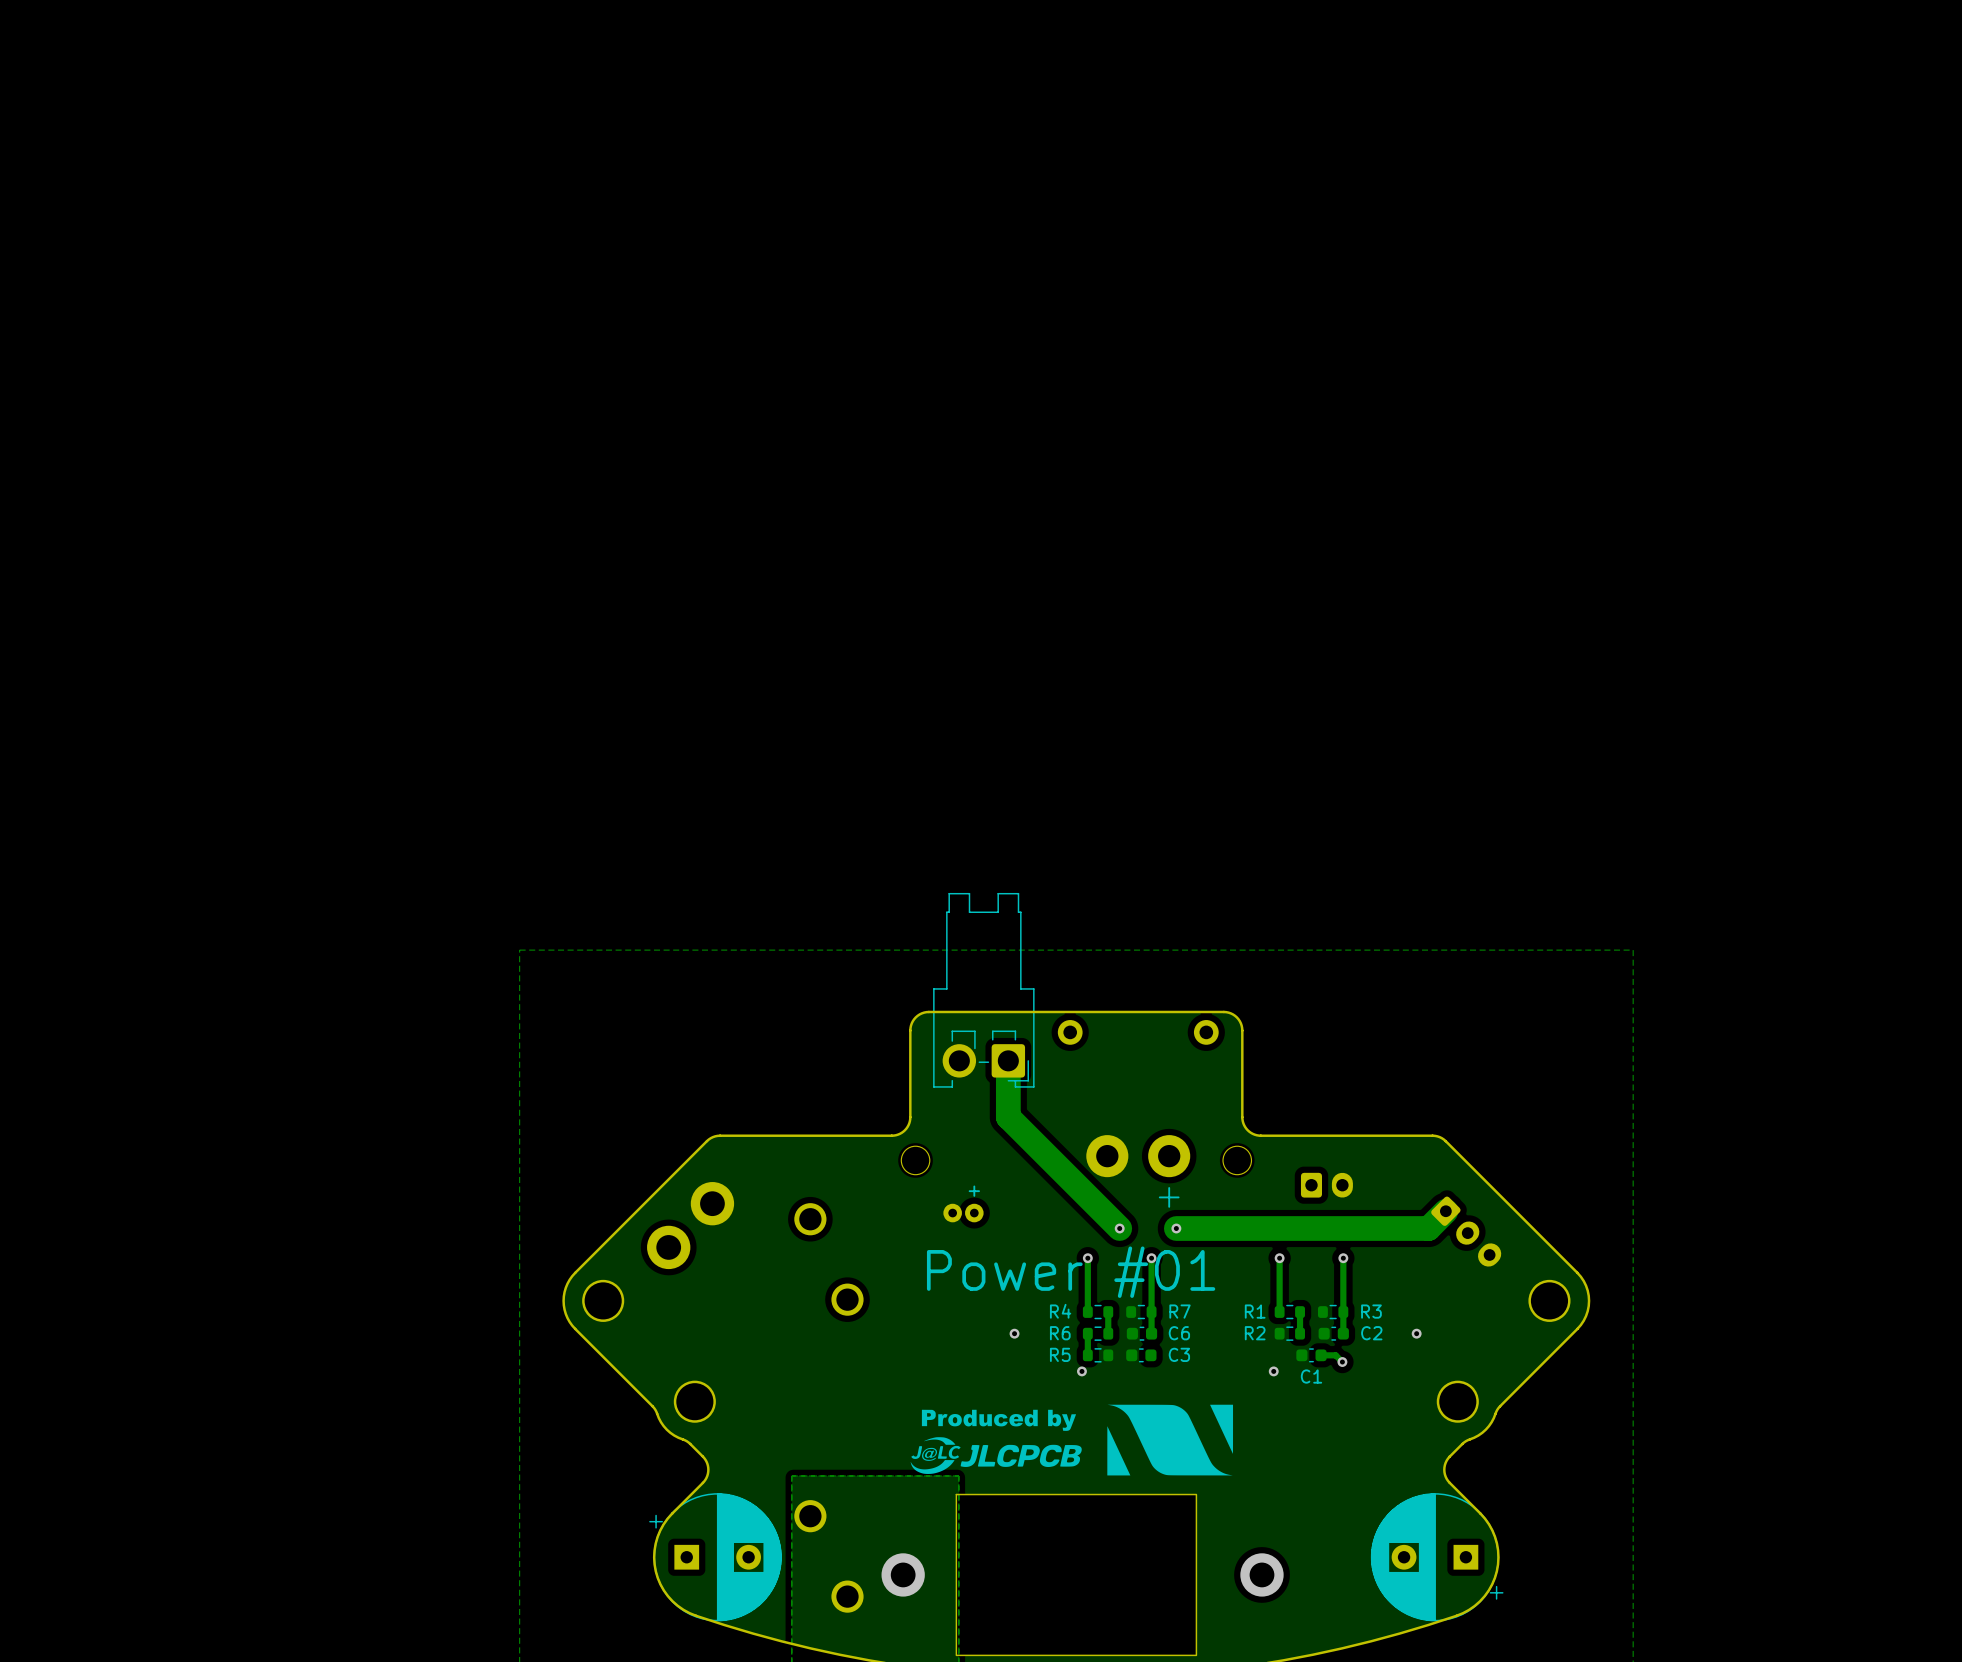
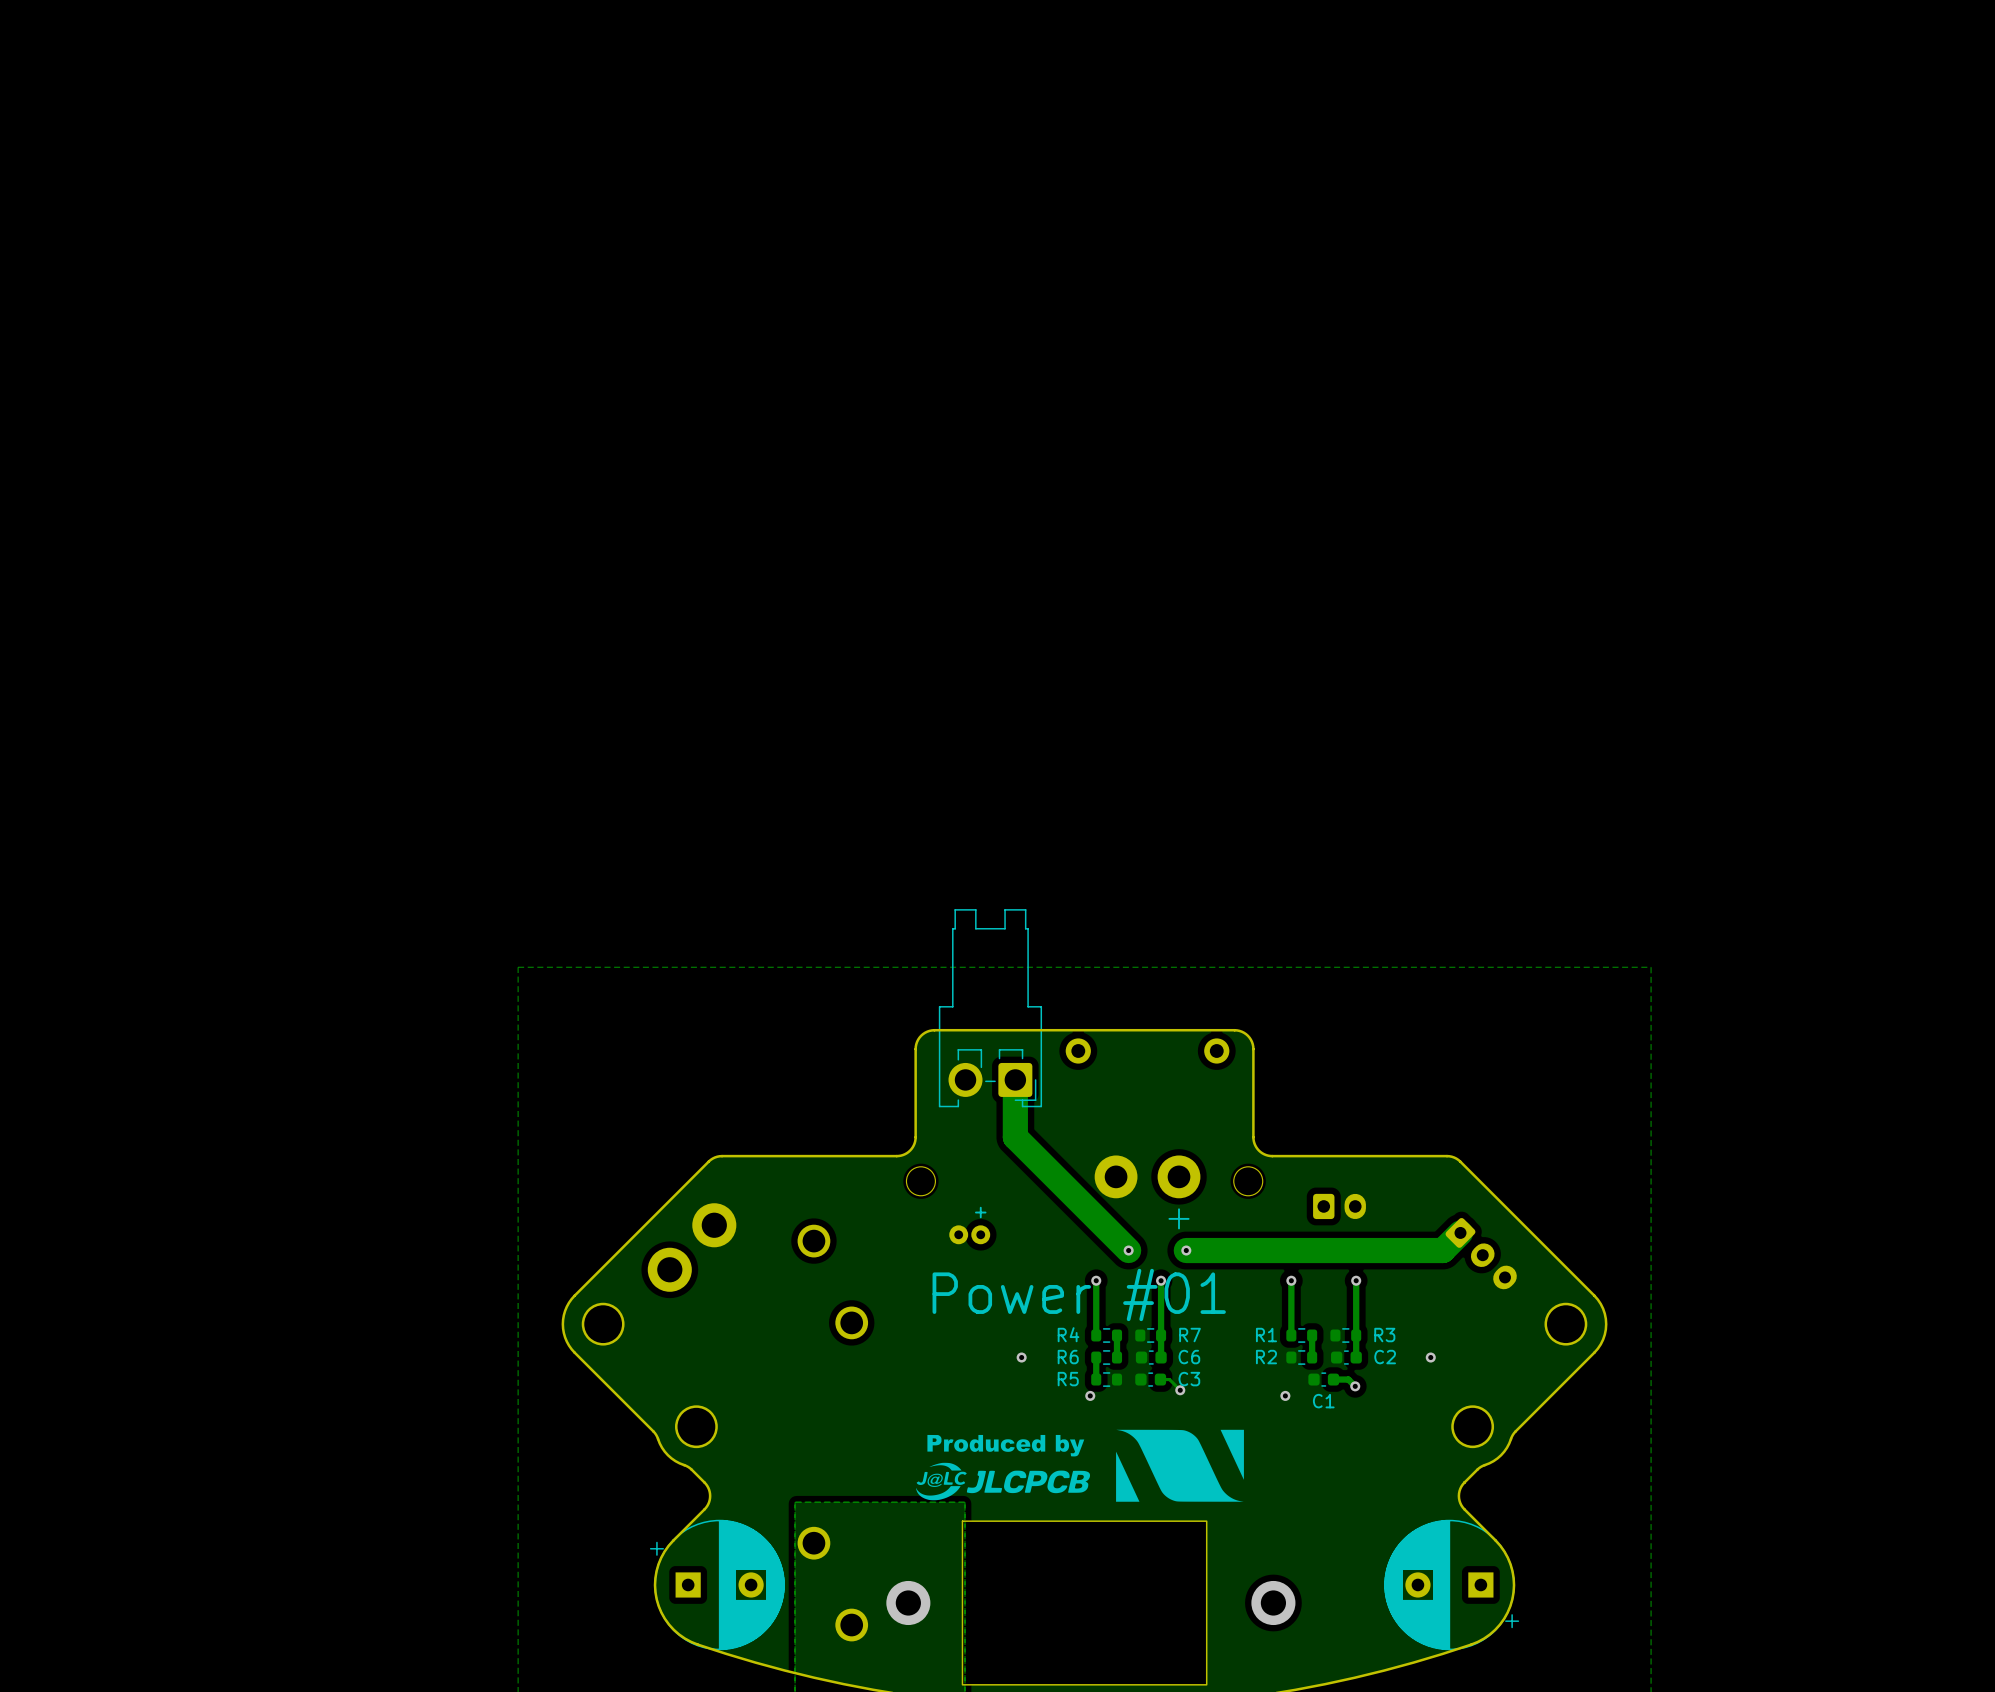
track: none -> (1160, 1379) (1169, 1379) (1180, 1390)
via: none -> (1180, 1390)

